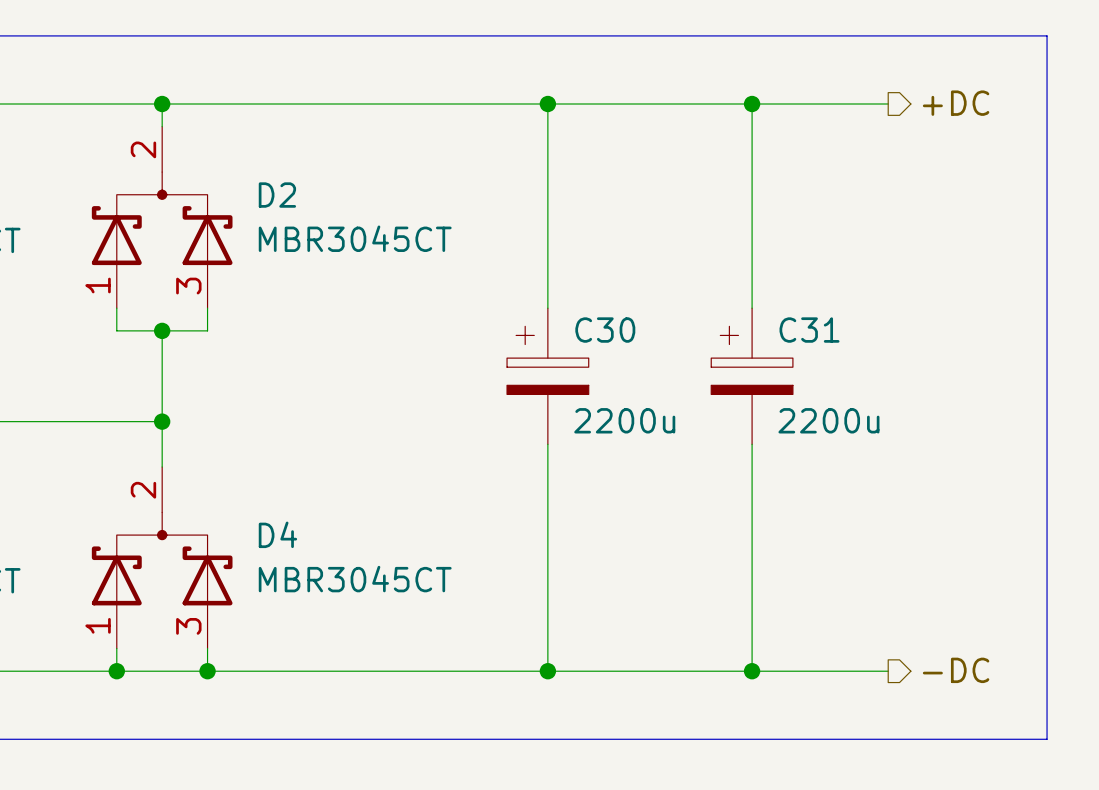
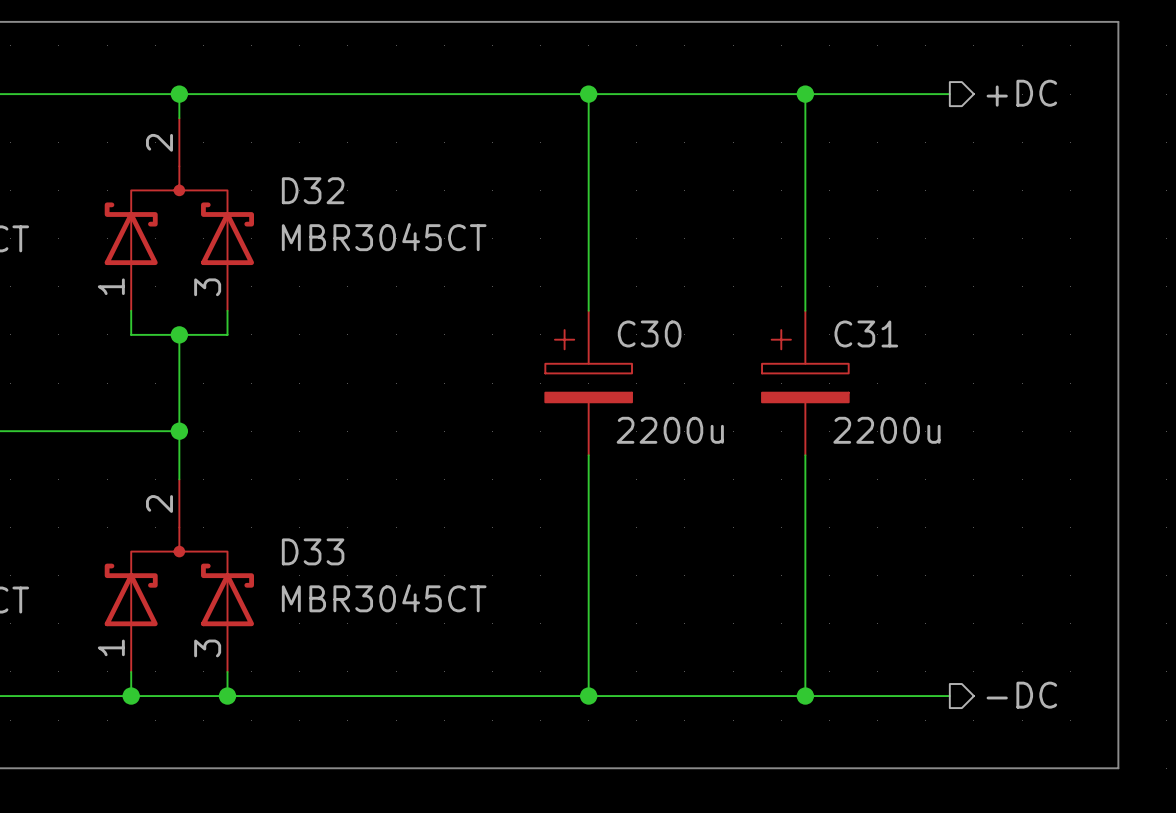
D2 name: D2 (277, 195) -> D32 (313, 190)
D4 name: D4 (277, 534) -> D33 (313, 551)

